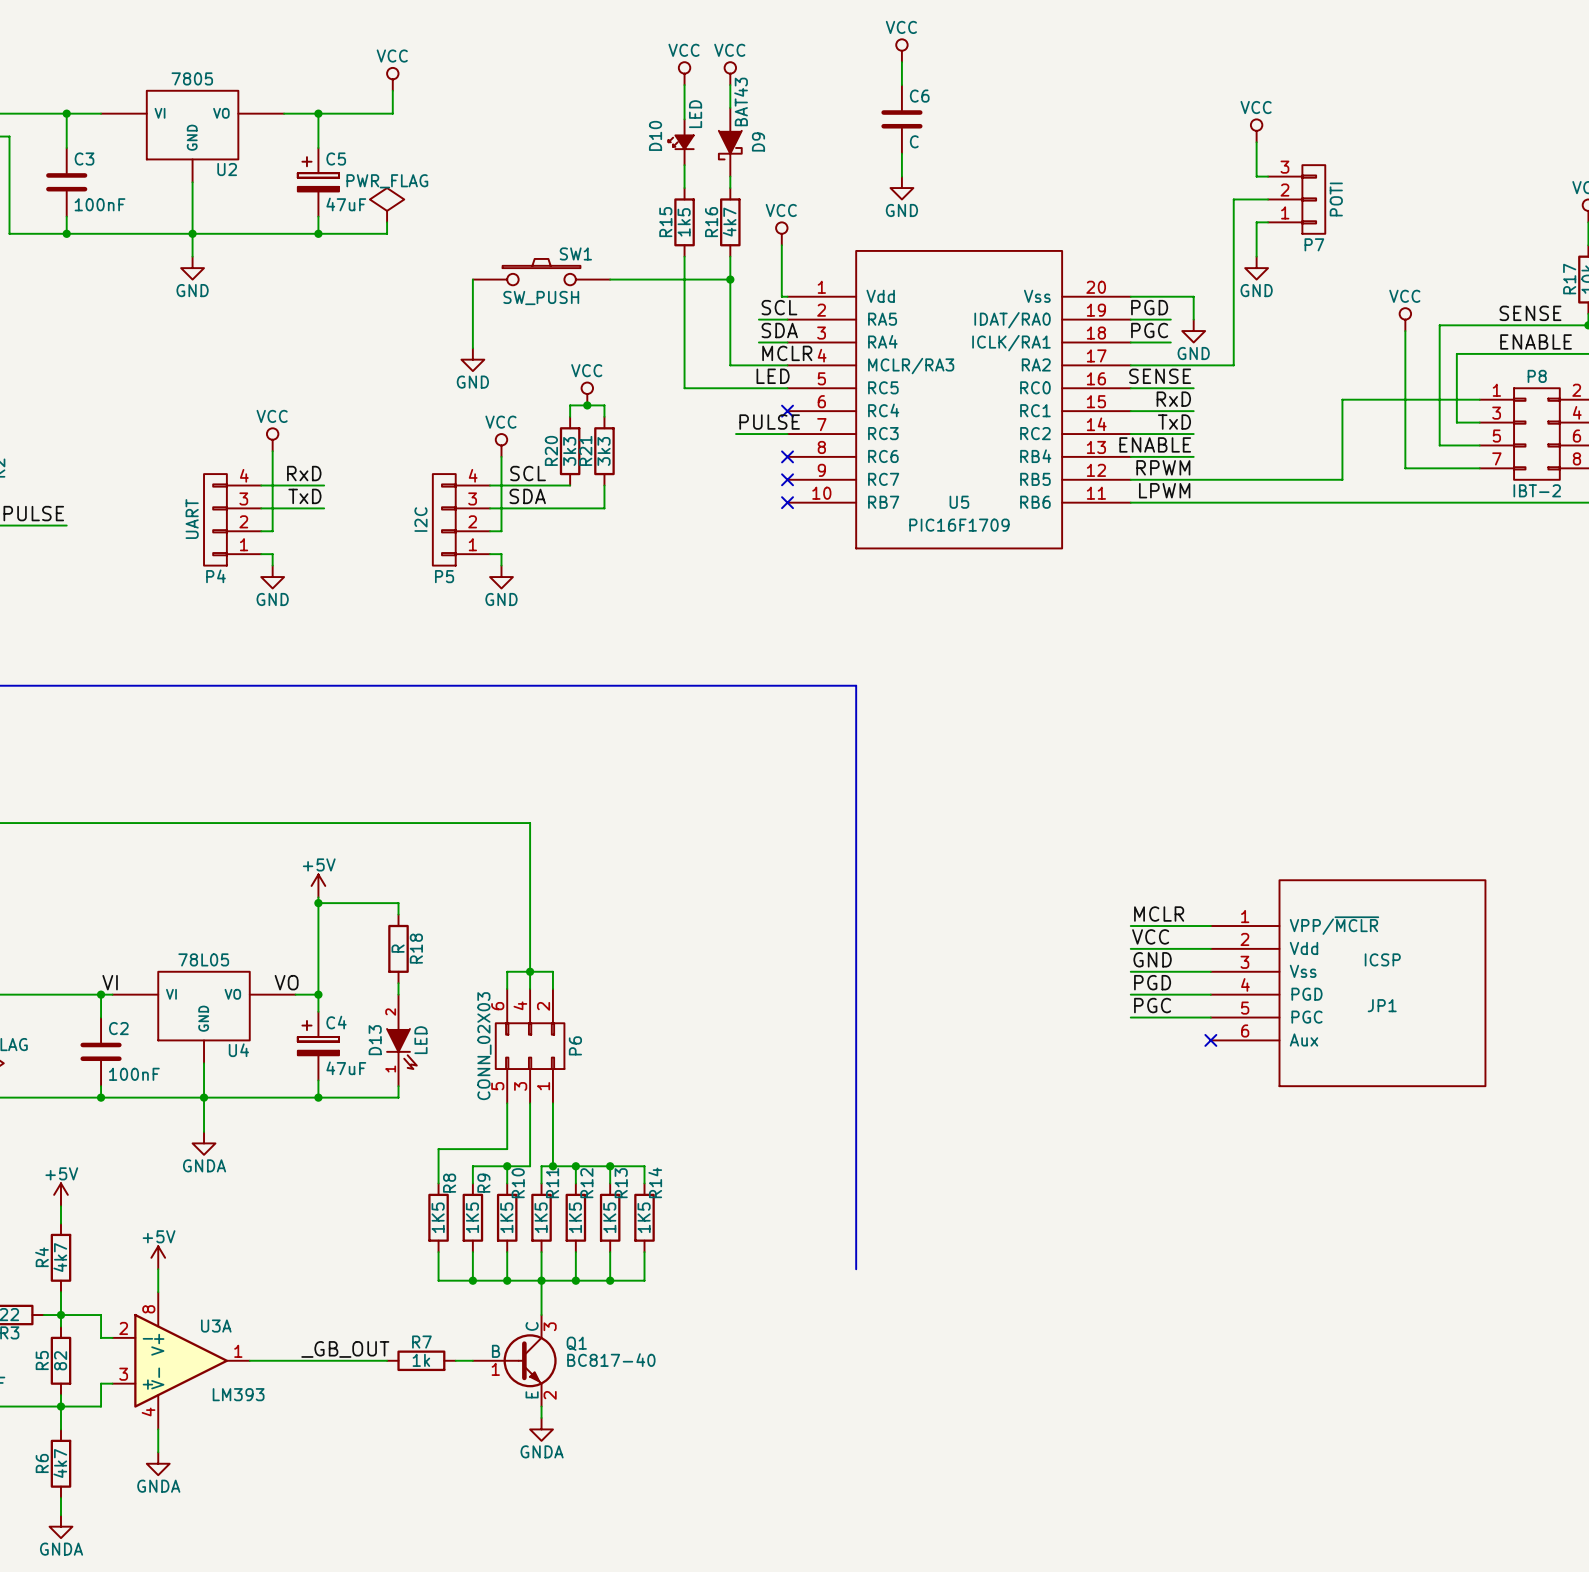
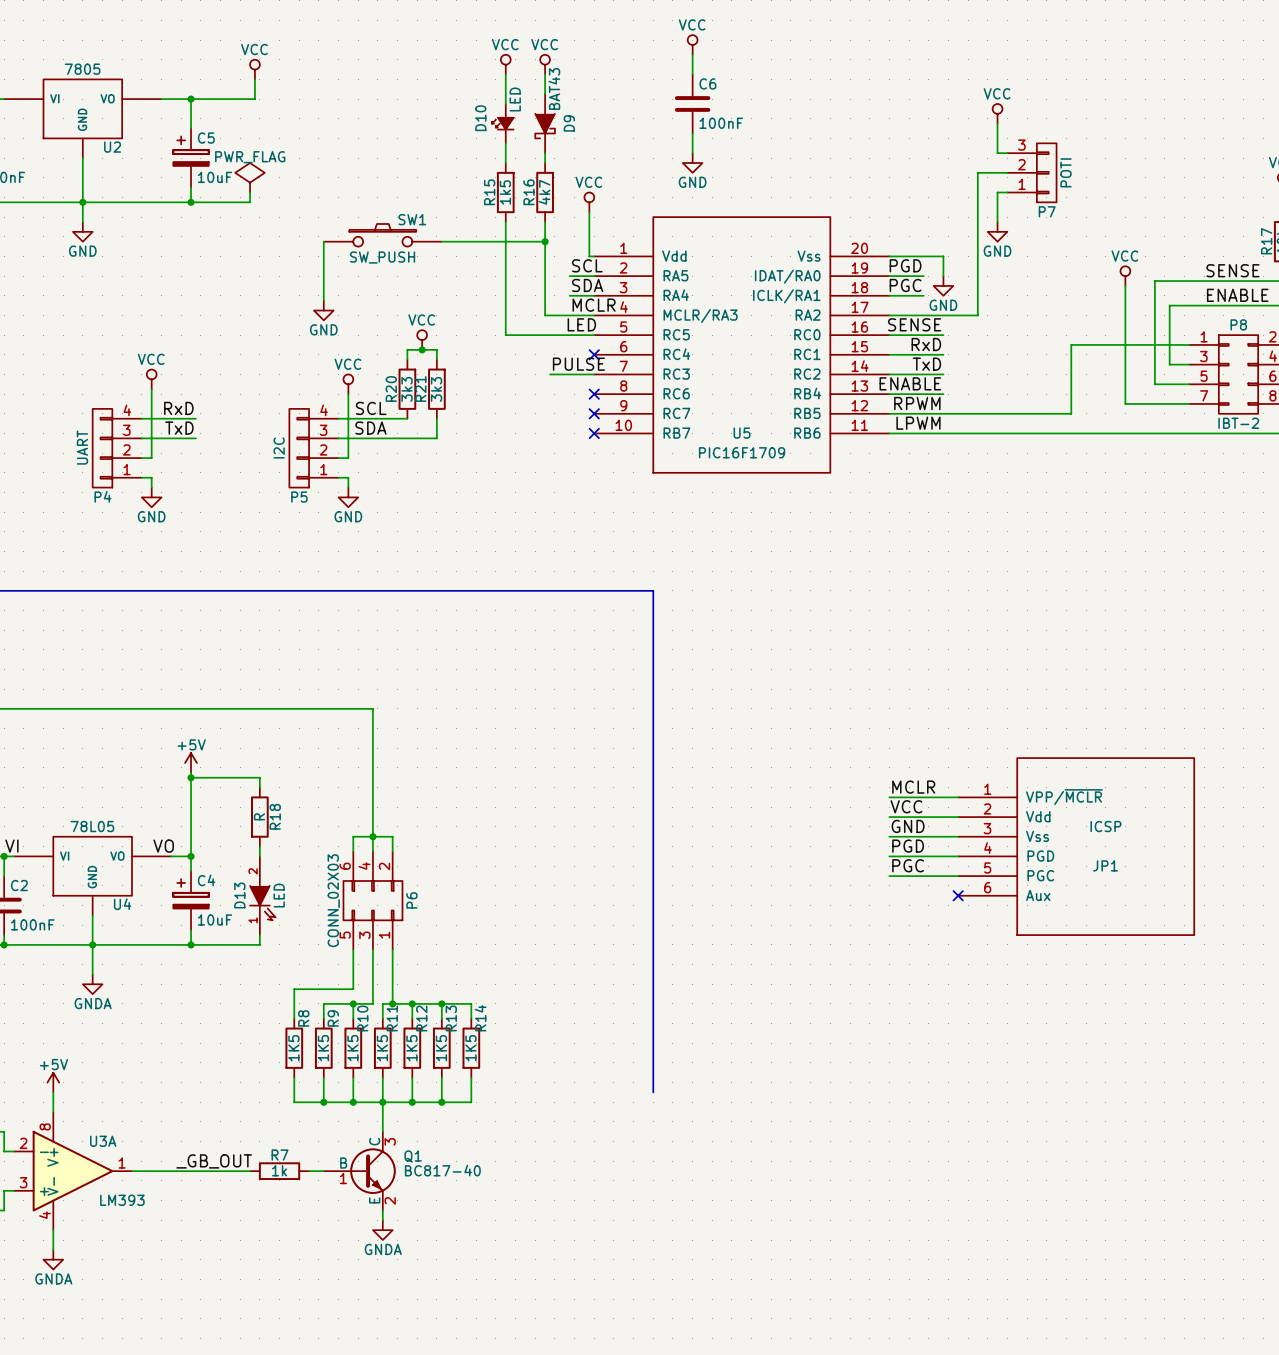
C6 value: C (914, 141) -> 100nF (721, 123)
C5 value: 47uF (346, 204) -> 10uF (214, 177)
C4 value: 47uF (346, 1068) -> 10uF (214, 919)

